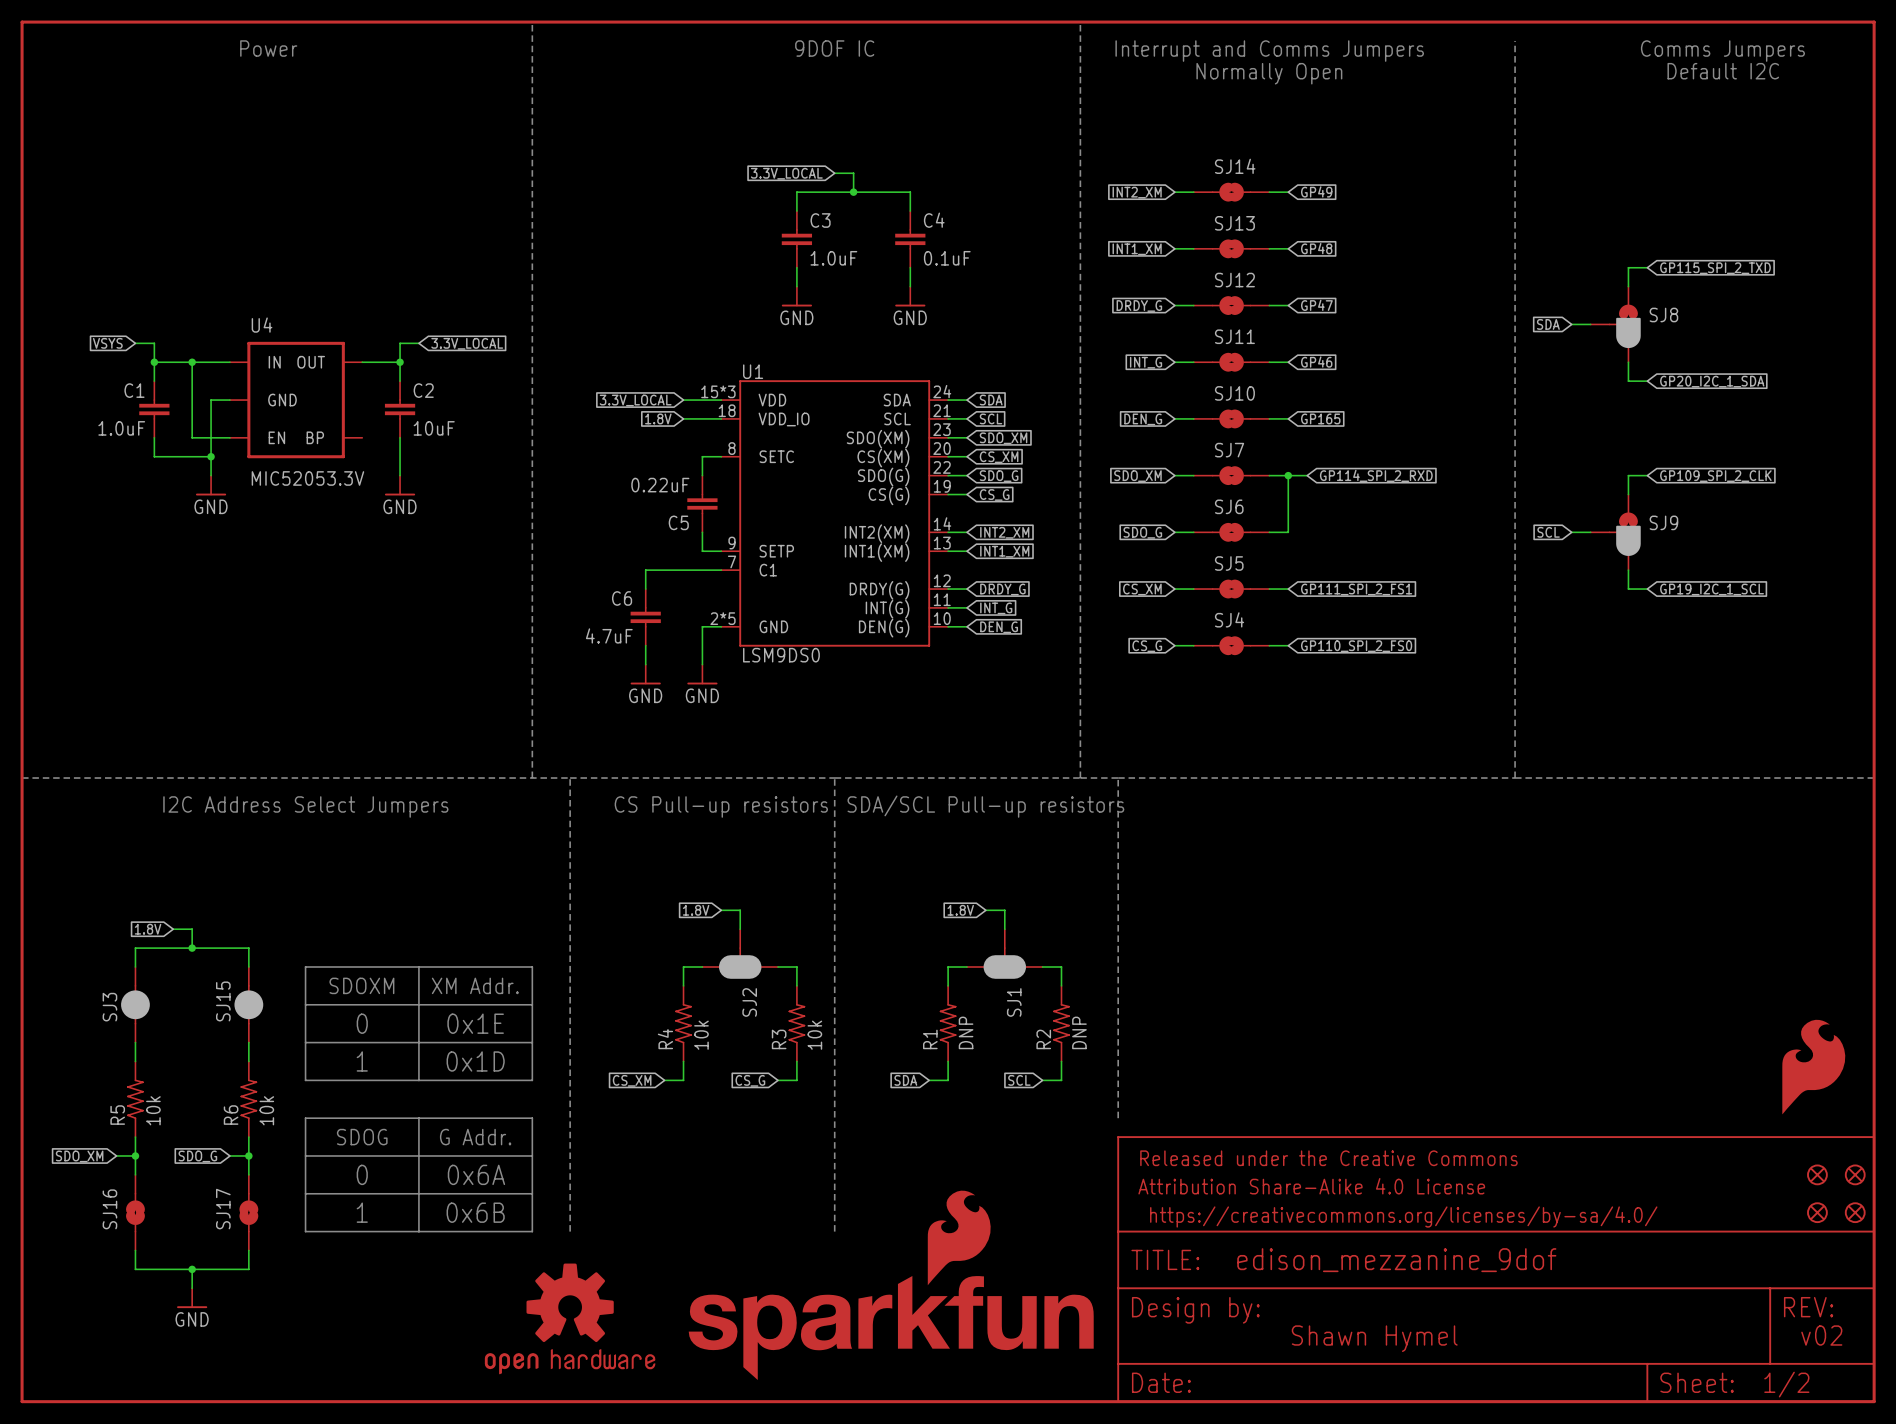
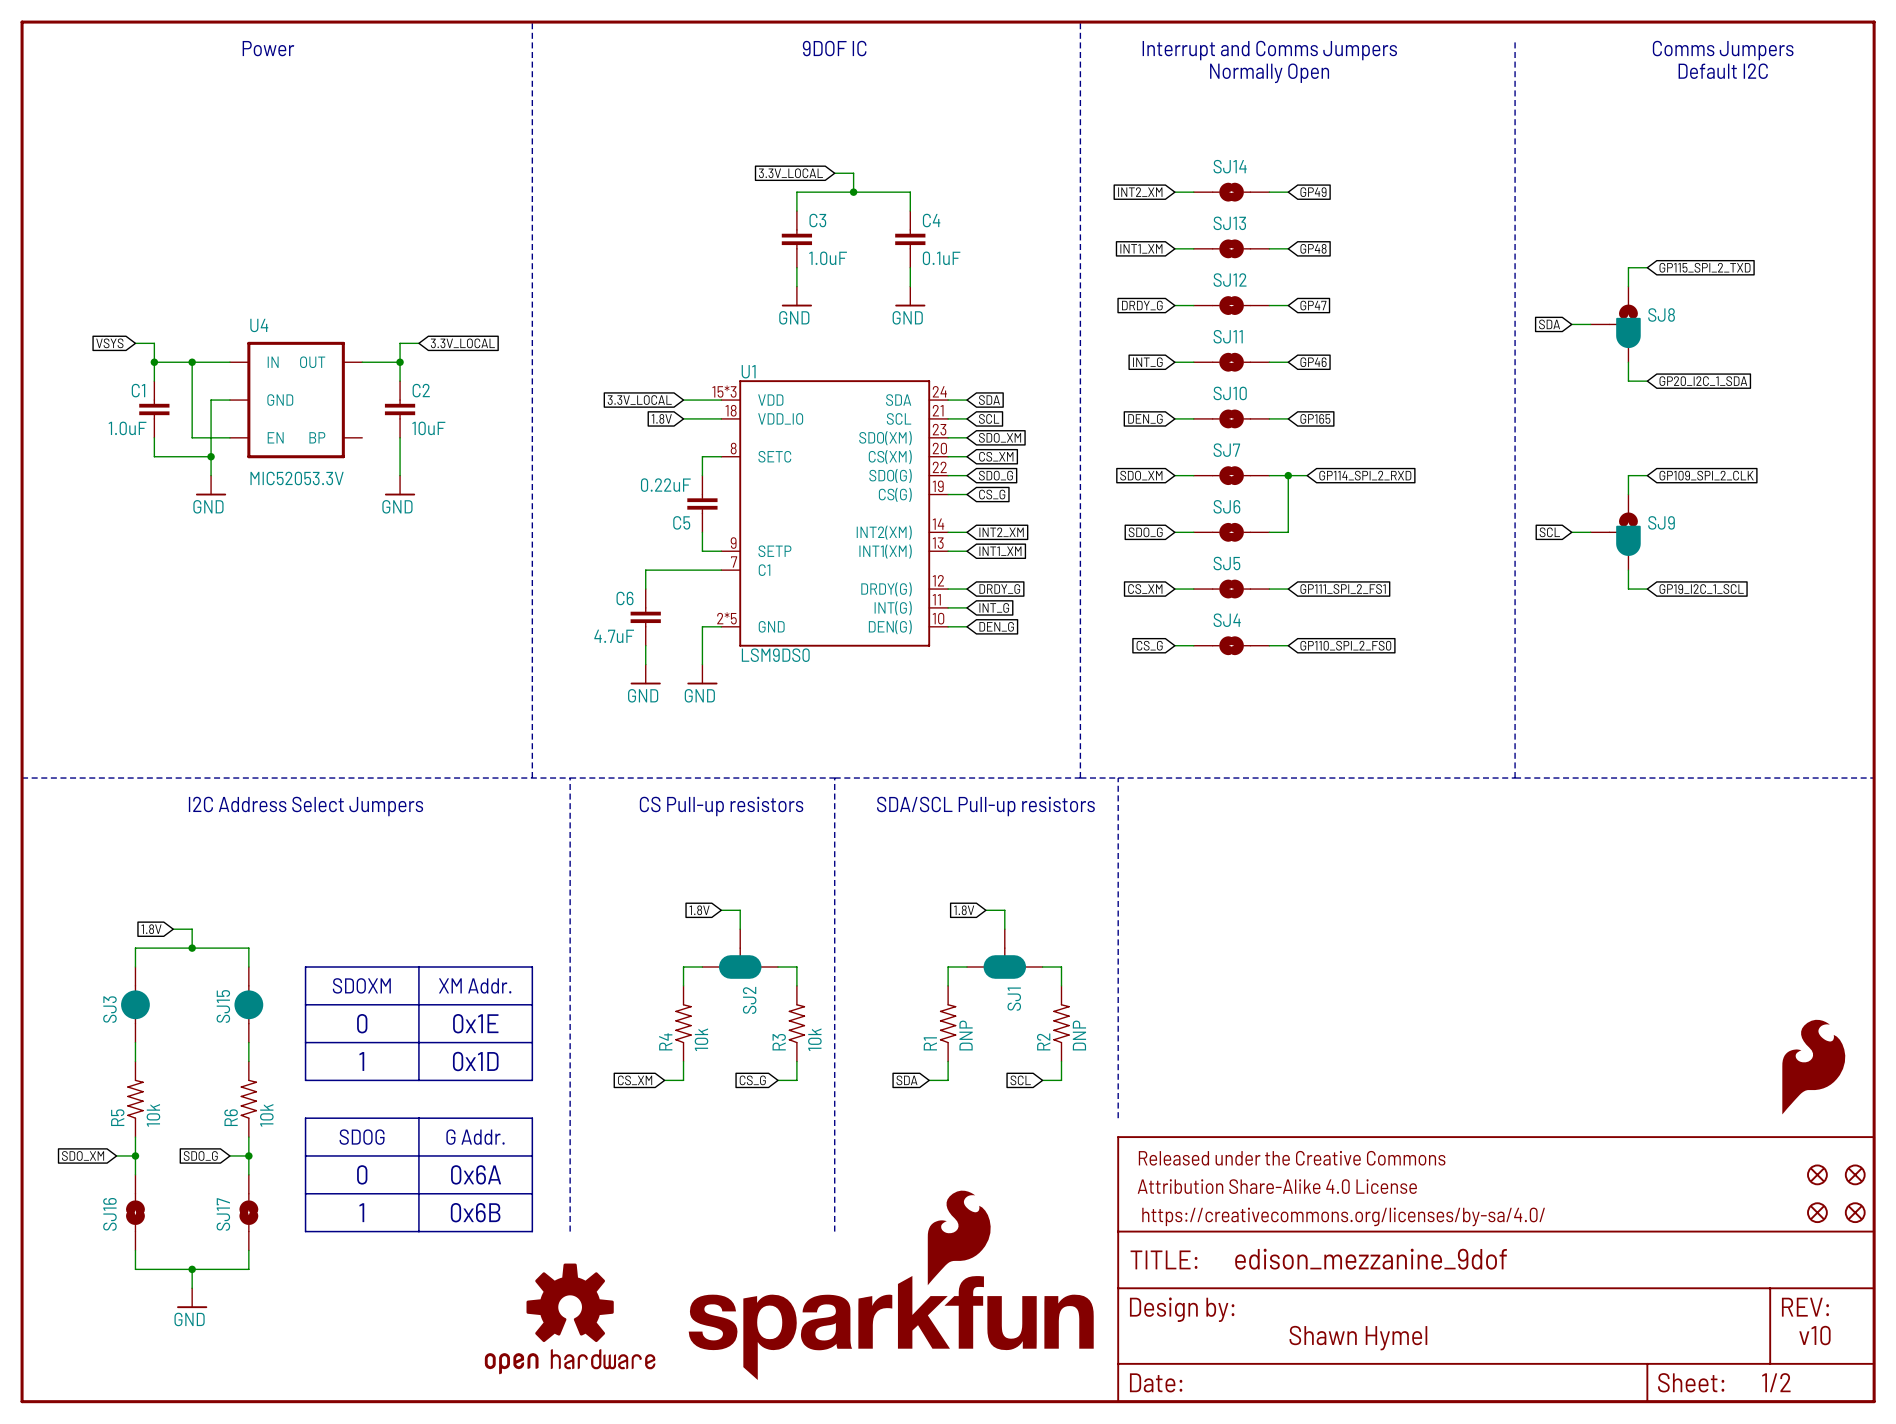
text: v02 (1821, 1335) -> v10 (1814, 1335)

